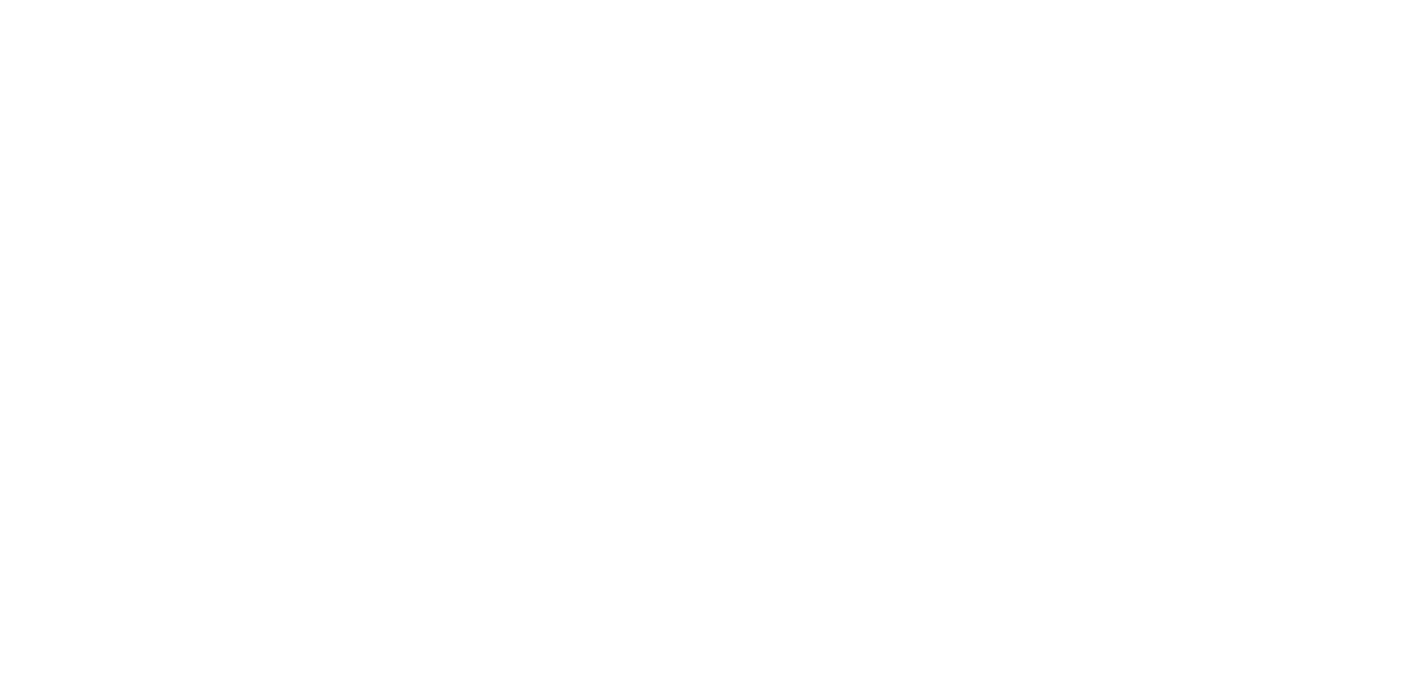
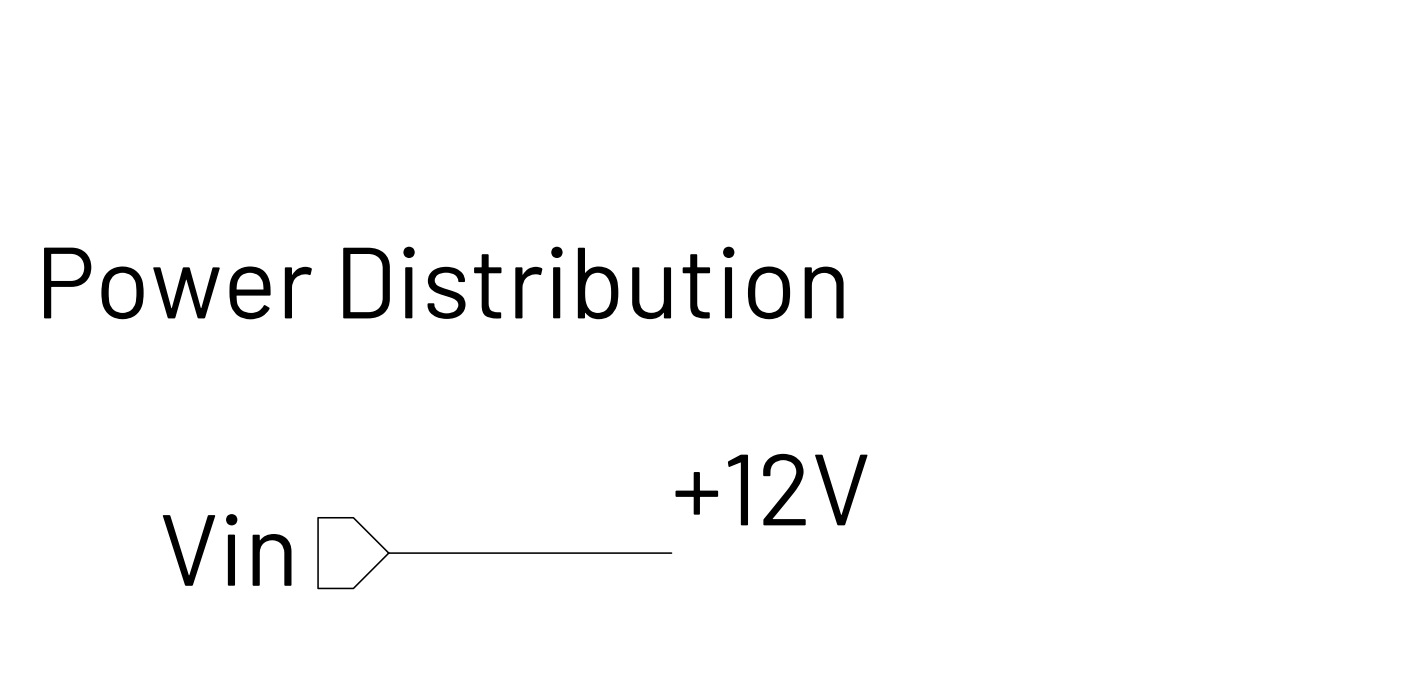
text: none -> Power Distribution (443, 283)
label: none -> +12V (771, 489)
hierarchical label: none -> Vin (227, 549)
wire: none -> (388, 553) (671, 553)

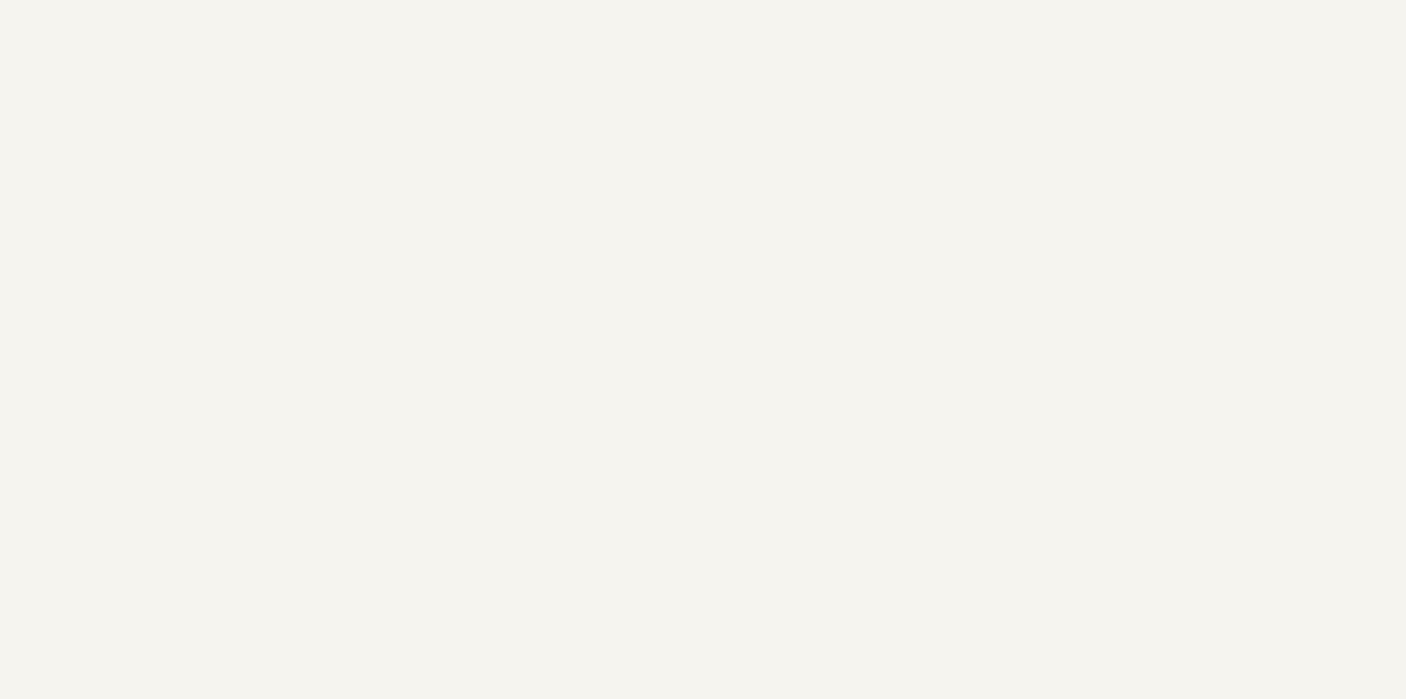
text: Power Distribution (443, 283) -> none
label: +12V (771, 489) -> none
hierarchical label: Vin (227, 549) -> none
wire: (388, 553) (671, 553) -> none

